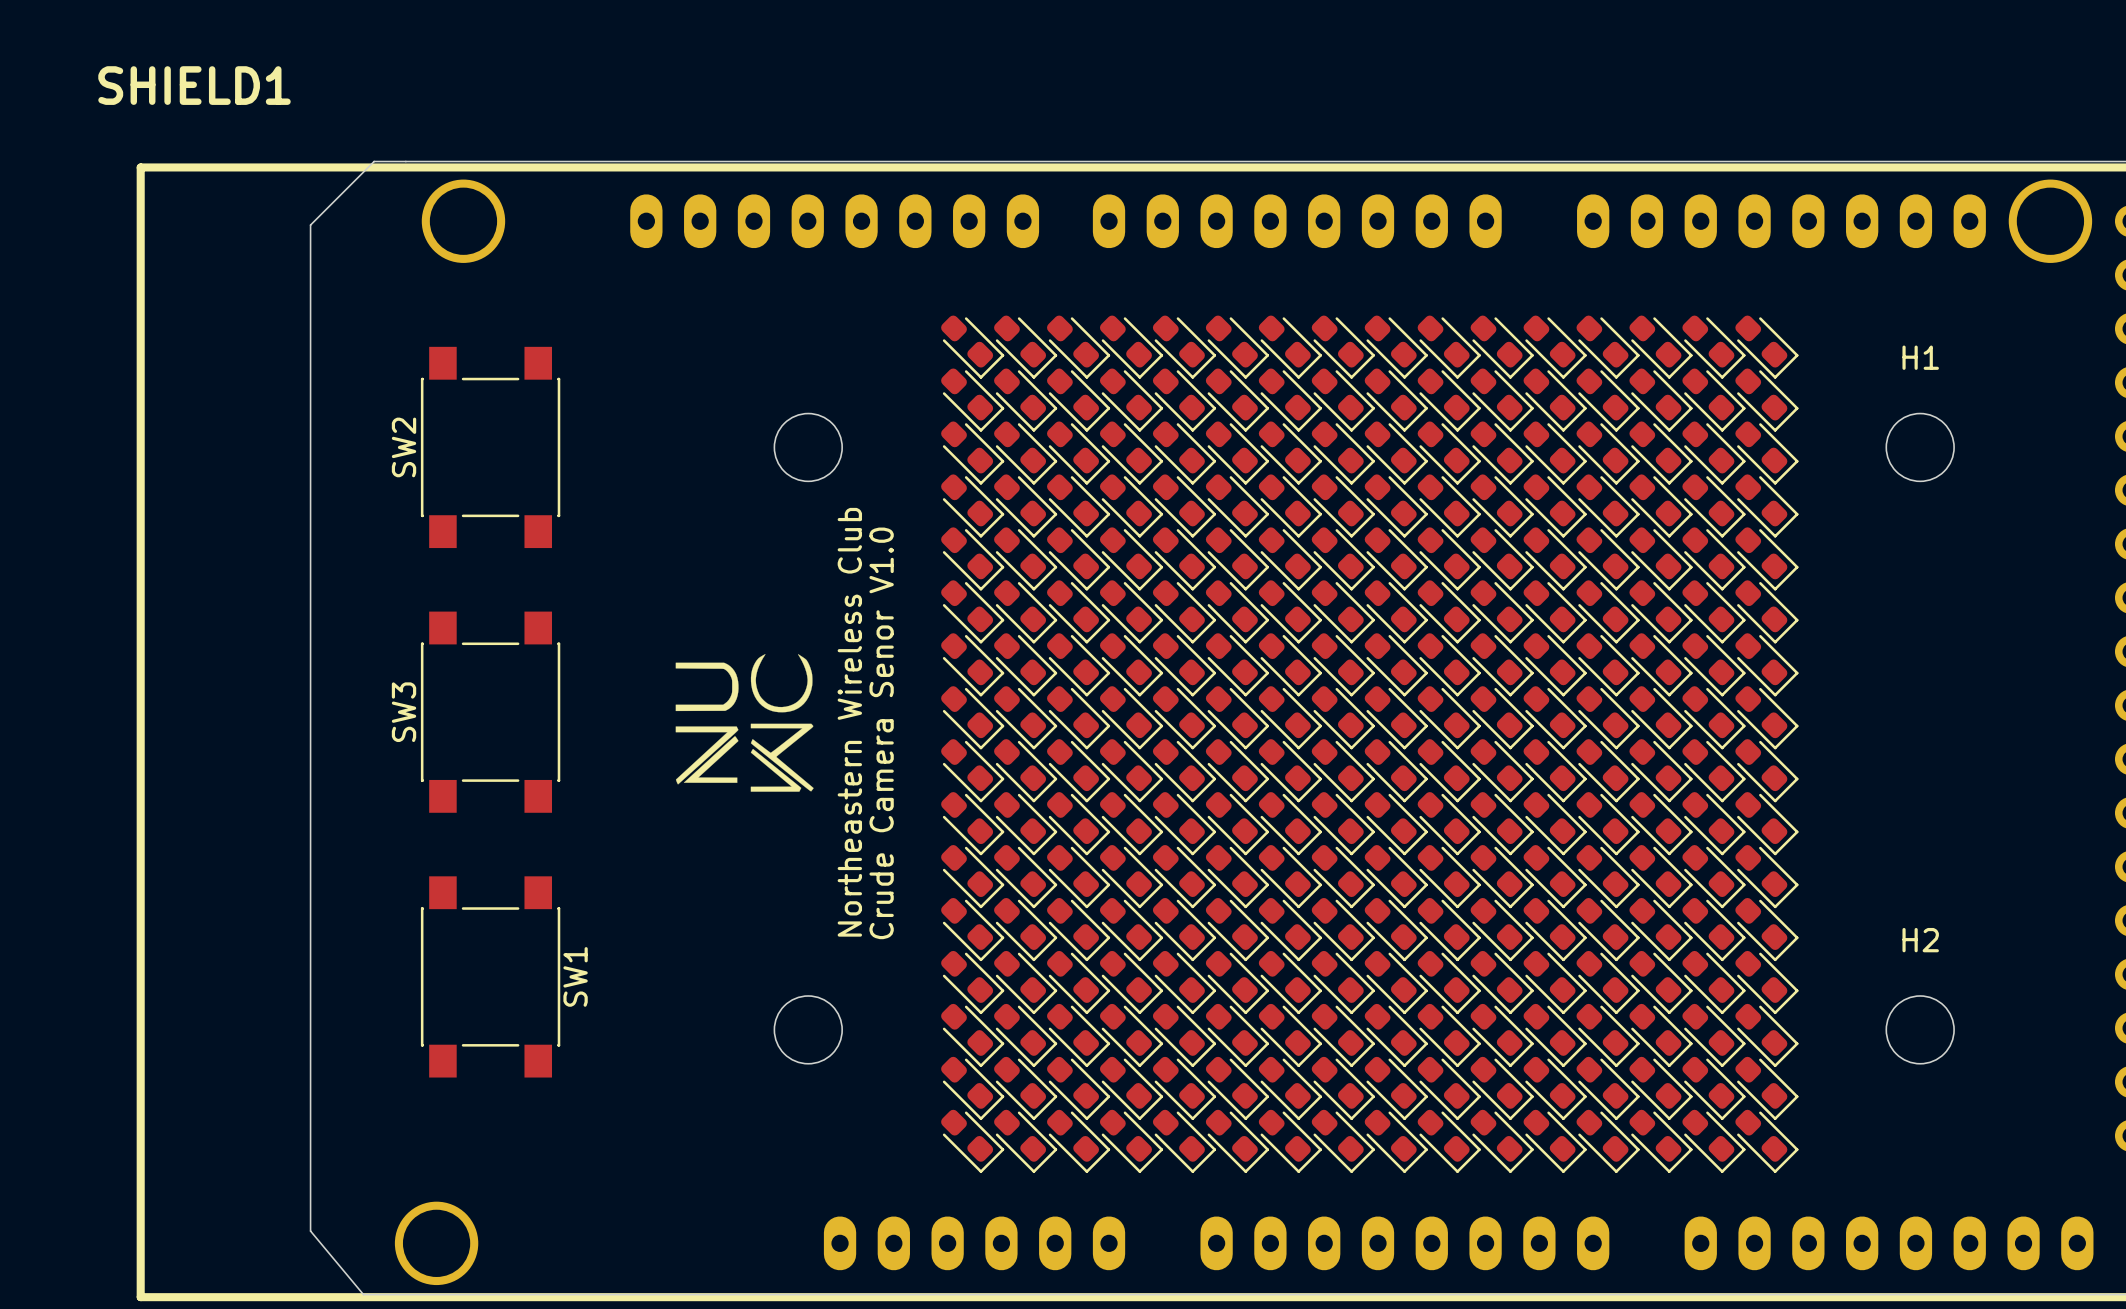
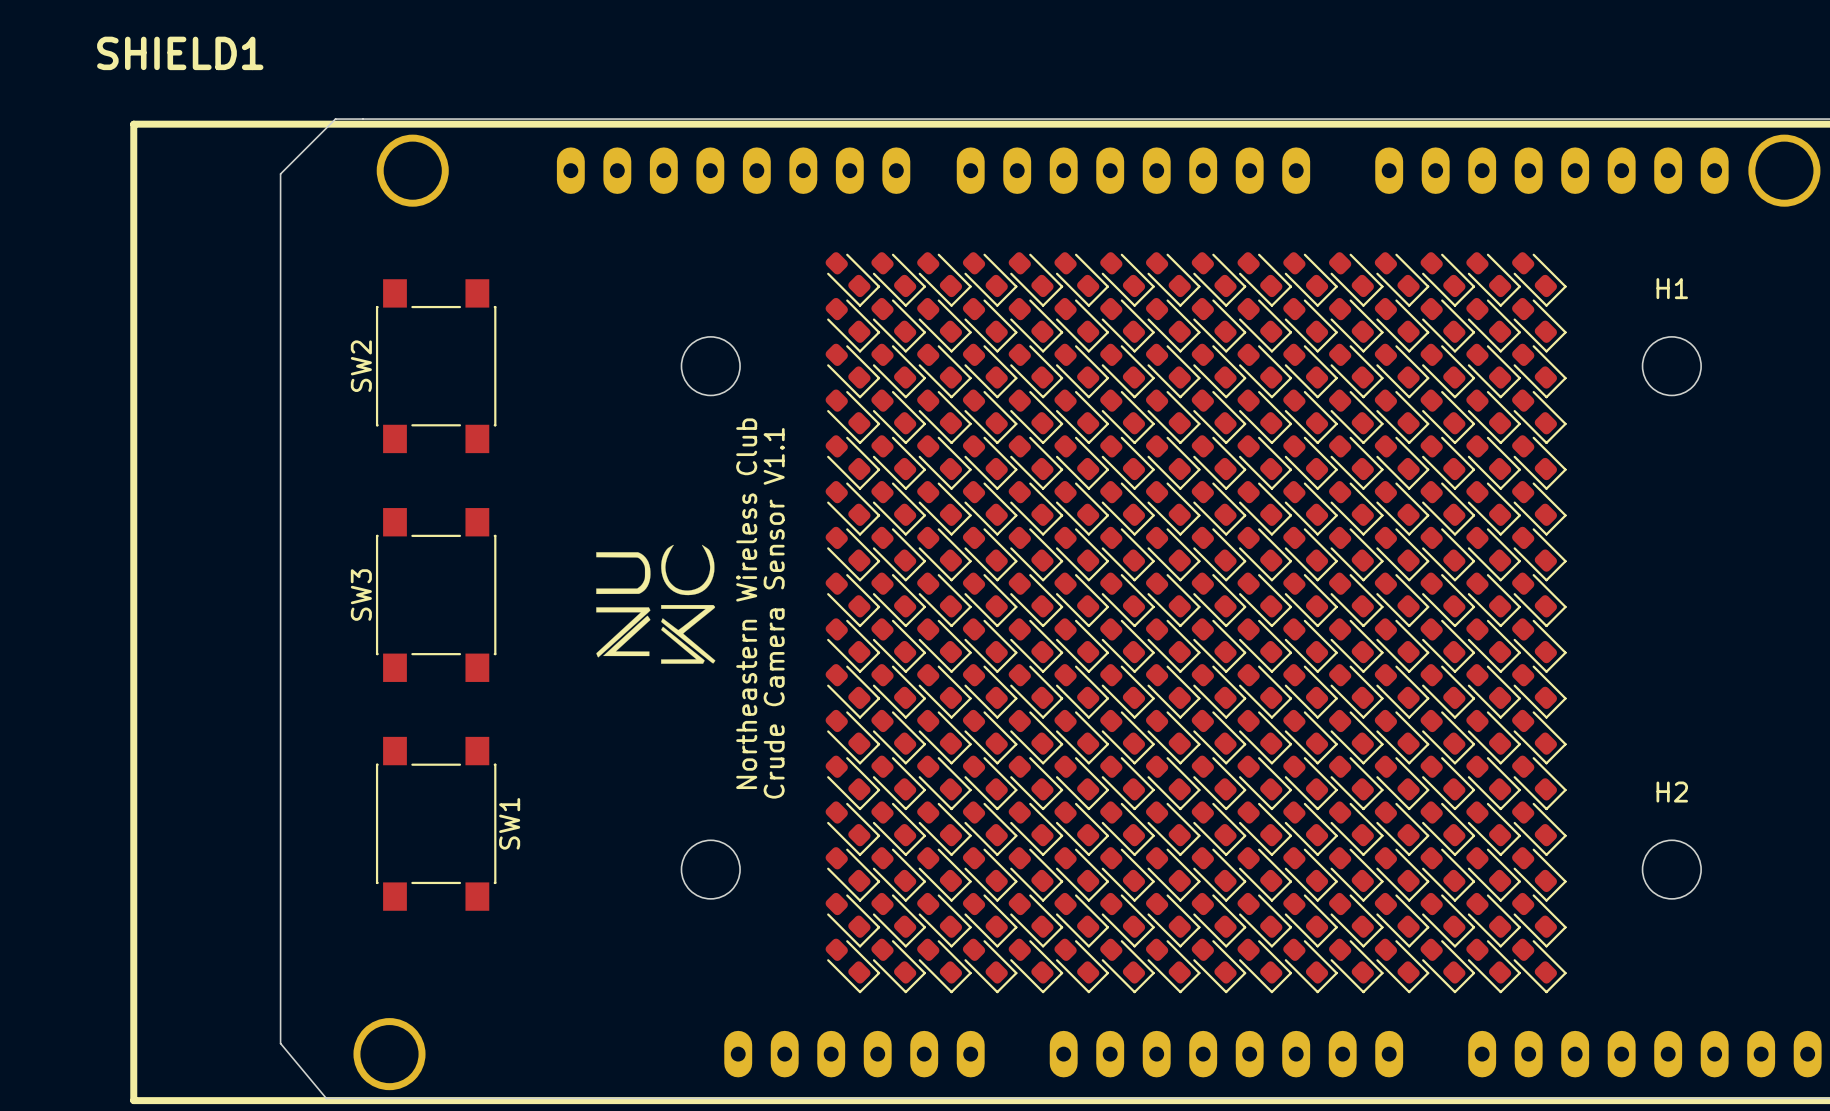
text: Crude Camera Senor V1.0 (881, 733) -> Crude Camera Sensor V1.1 (774, 613)

